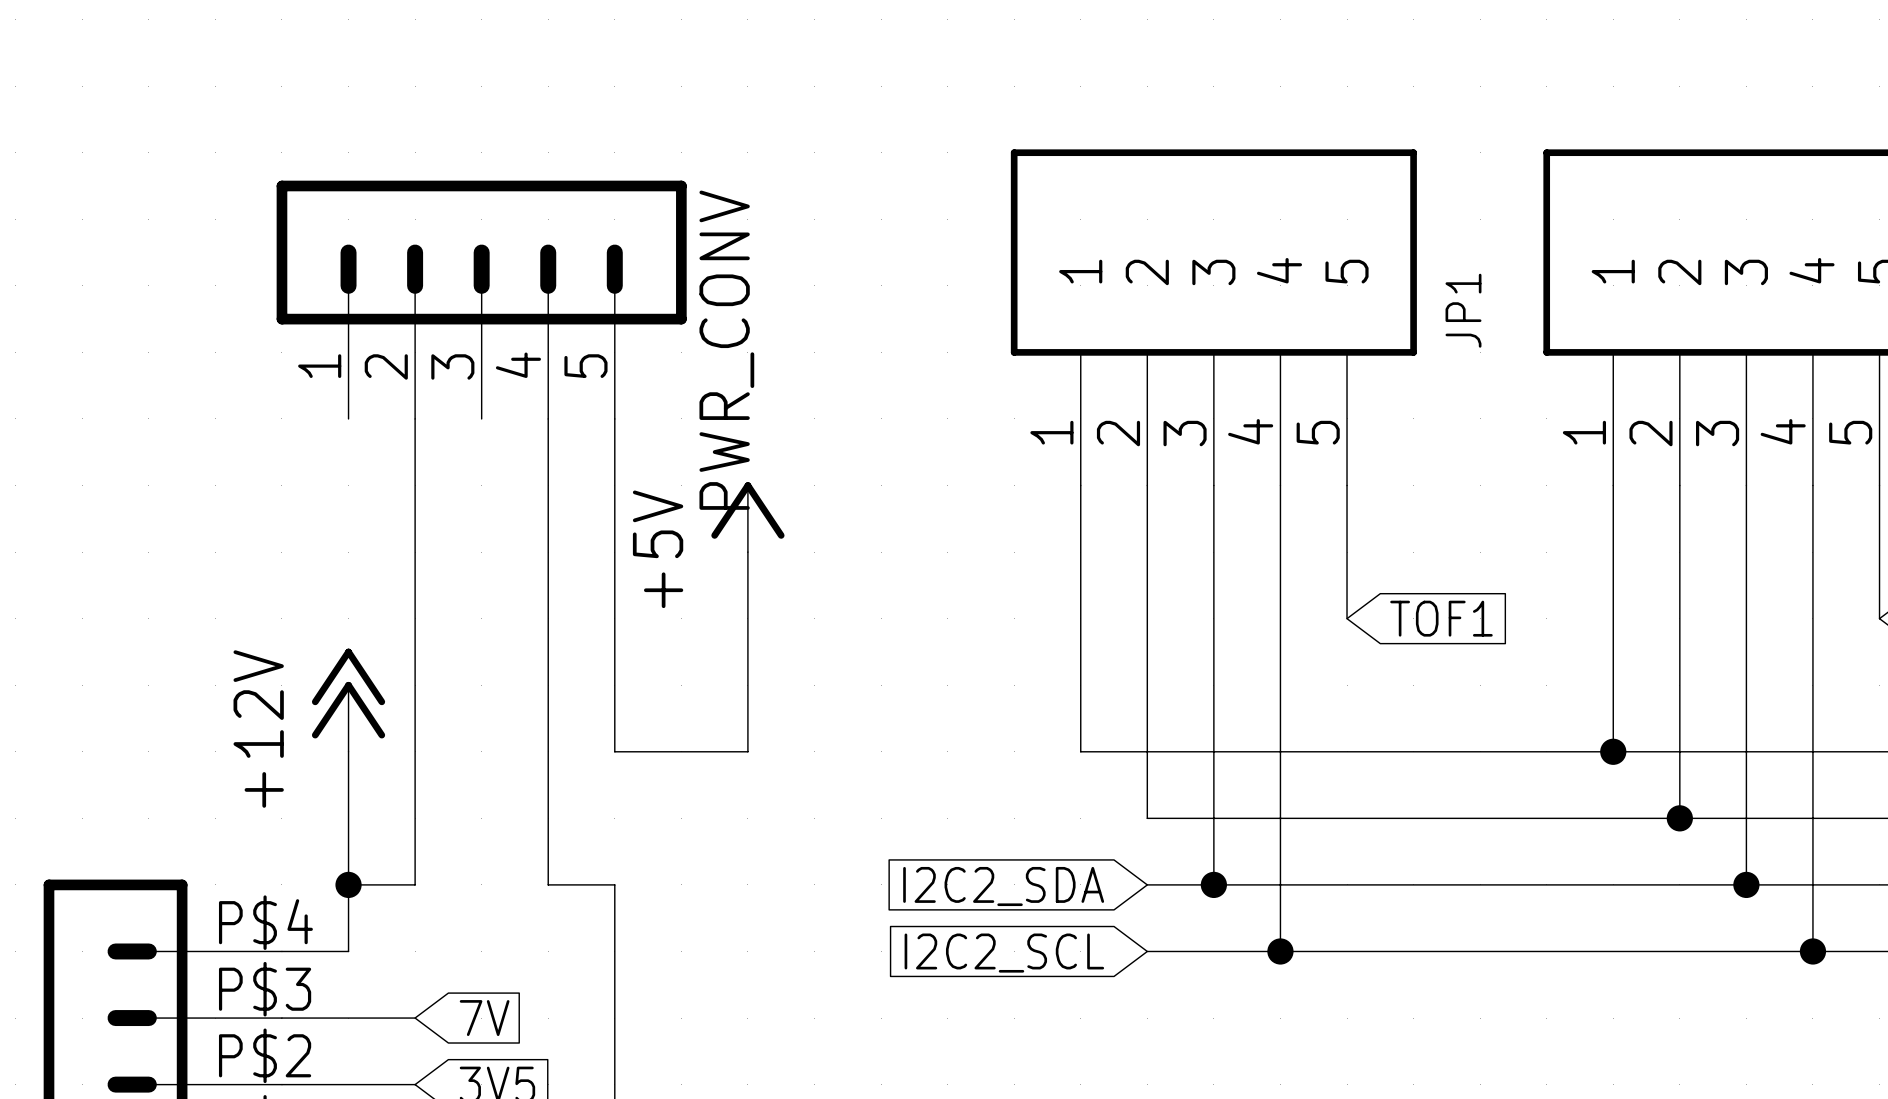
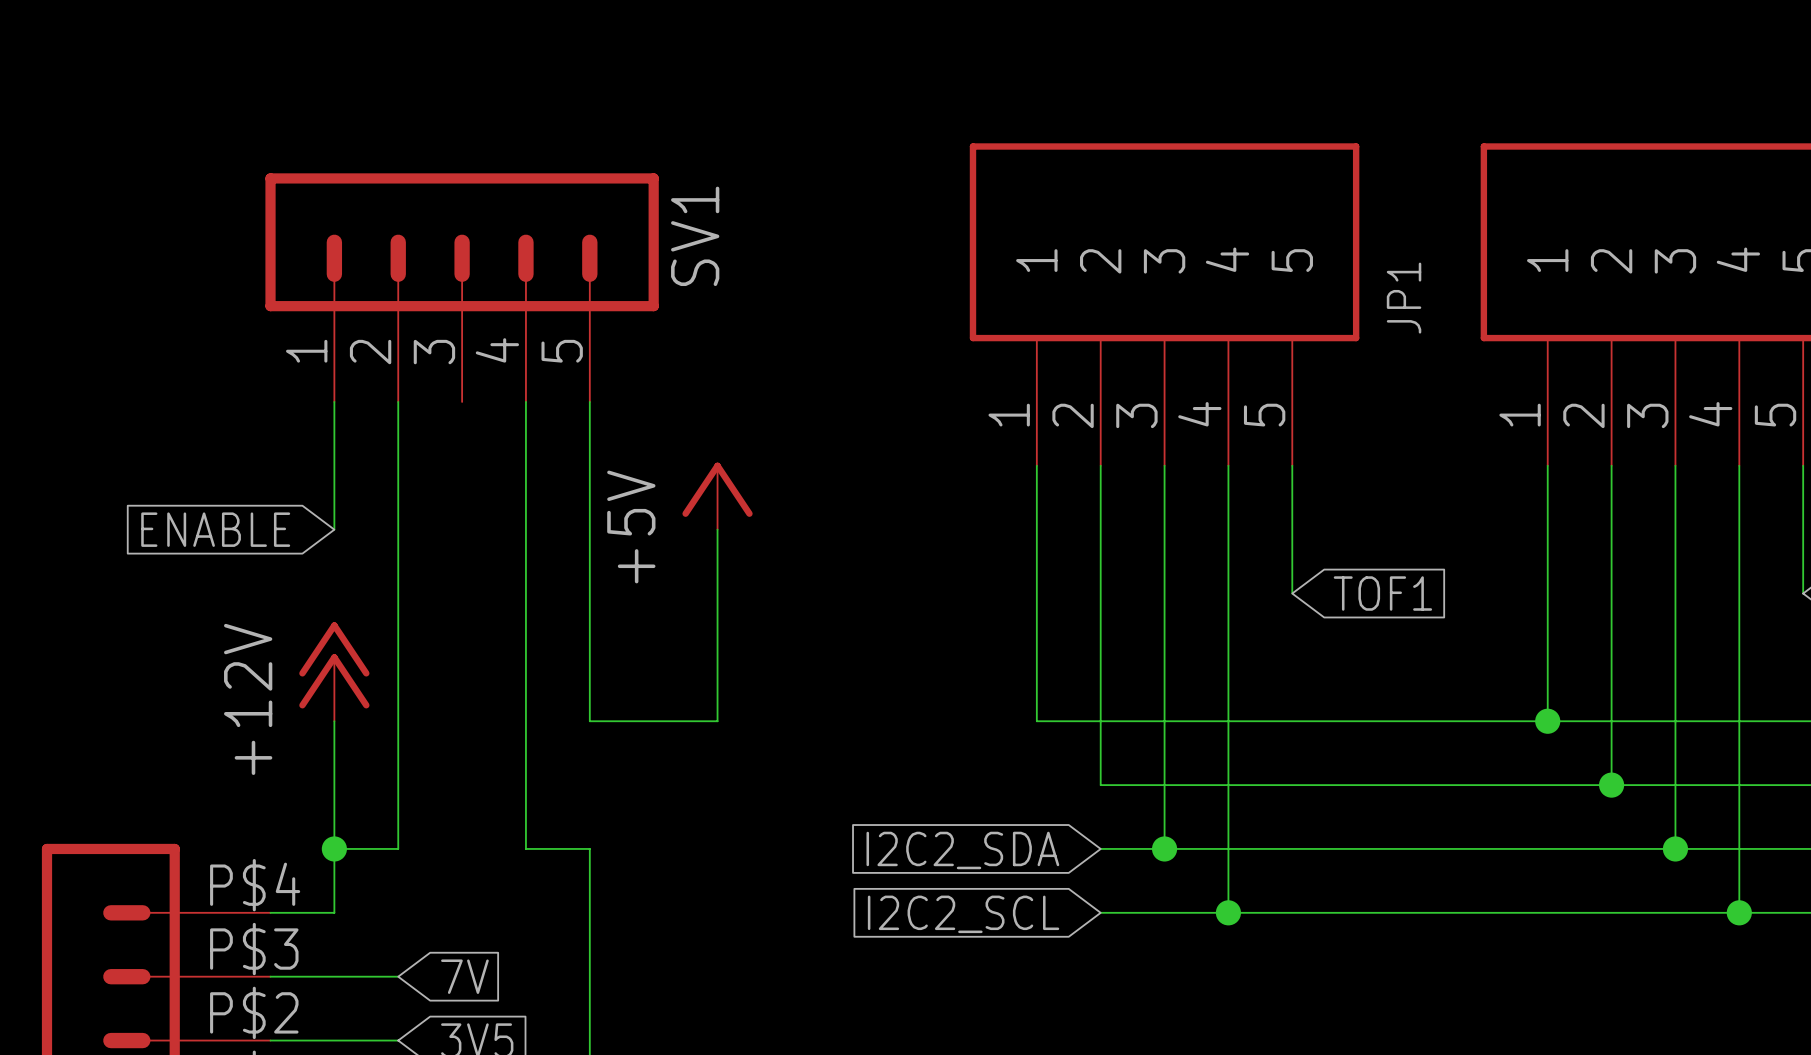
PWR_CONV name: PWR_CONV (726, 350) -> SV1 (695, 236)
wire: none -> (334, 401) (334, 529)
global label: none -> ENABLE (215, 529)

